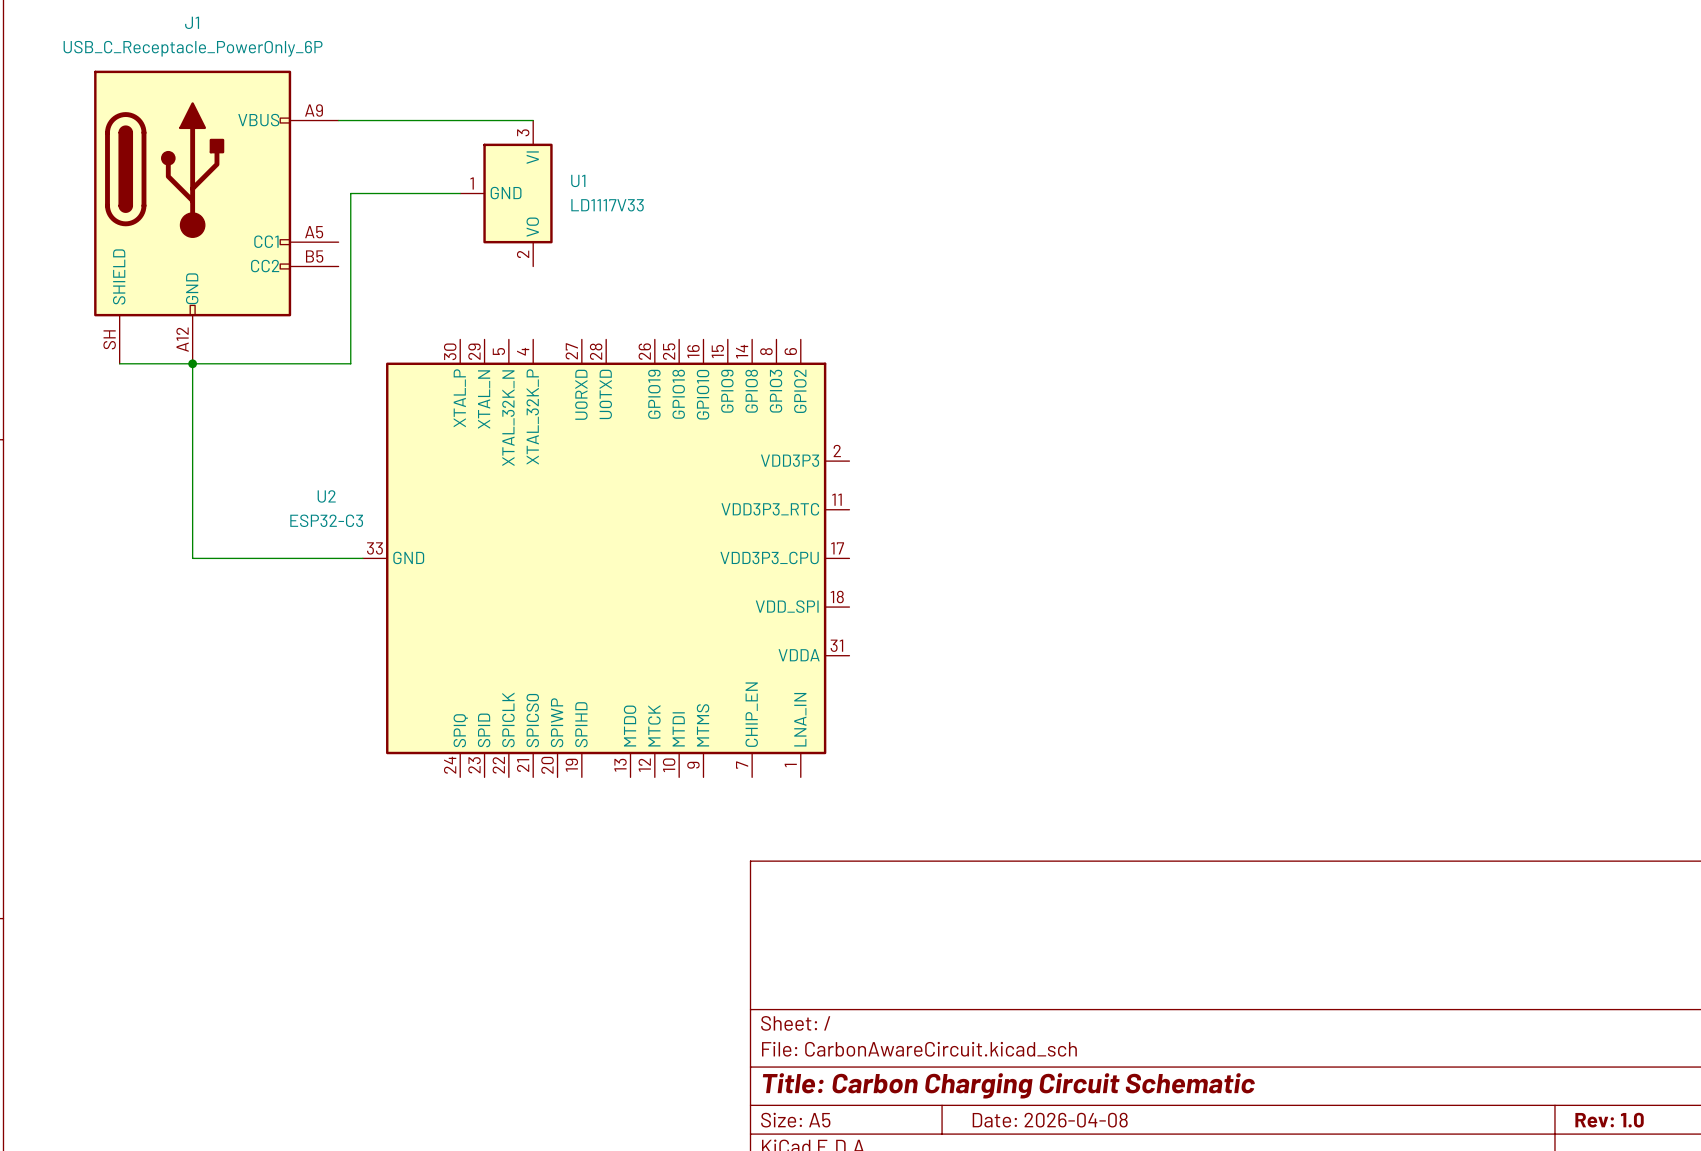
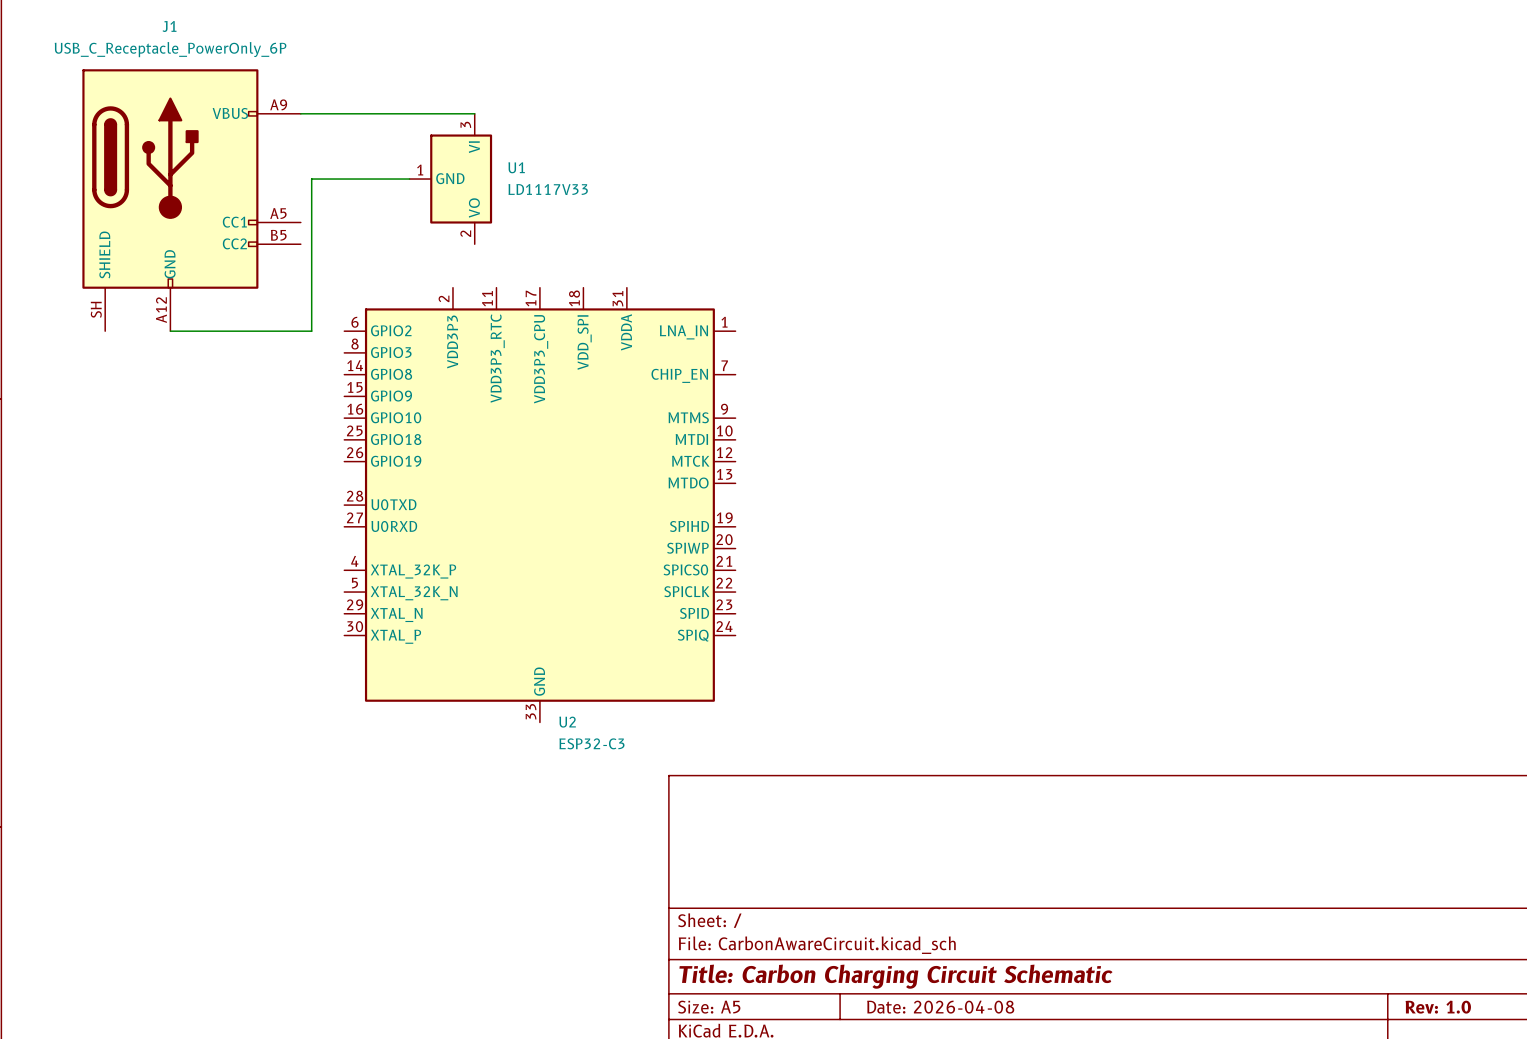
wire: (119, 363) (192, 363) (192, 558) (362, 558) -> none
junction: (192, 363) -> none
U2 name position: U2 (326, 496) -> U2 (567, 722)
U2 value position: ESP32-C3 (326, 520) -> ESP32-C3 (591, 743)
U2 rotation: 0° (606, 558) -> 90° counterclockwise (539, 505)

